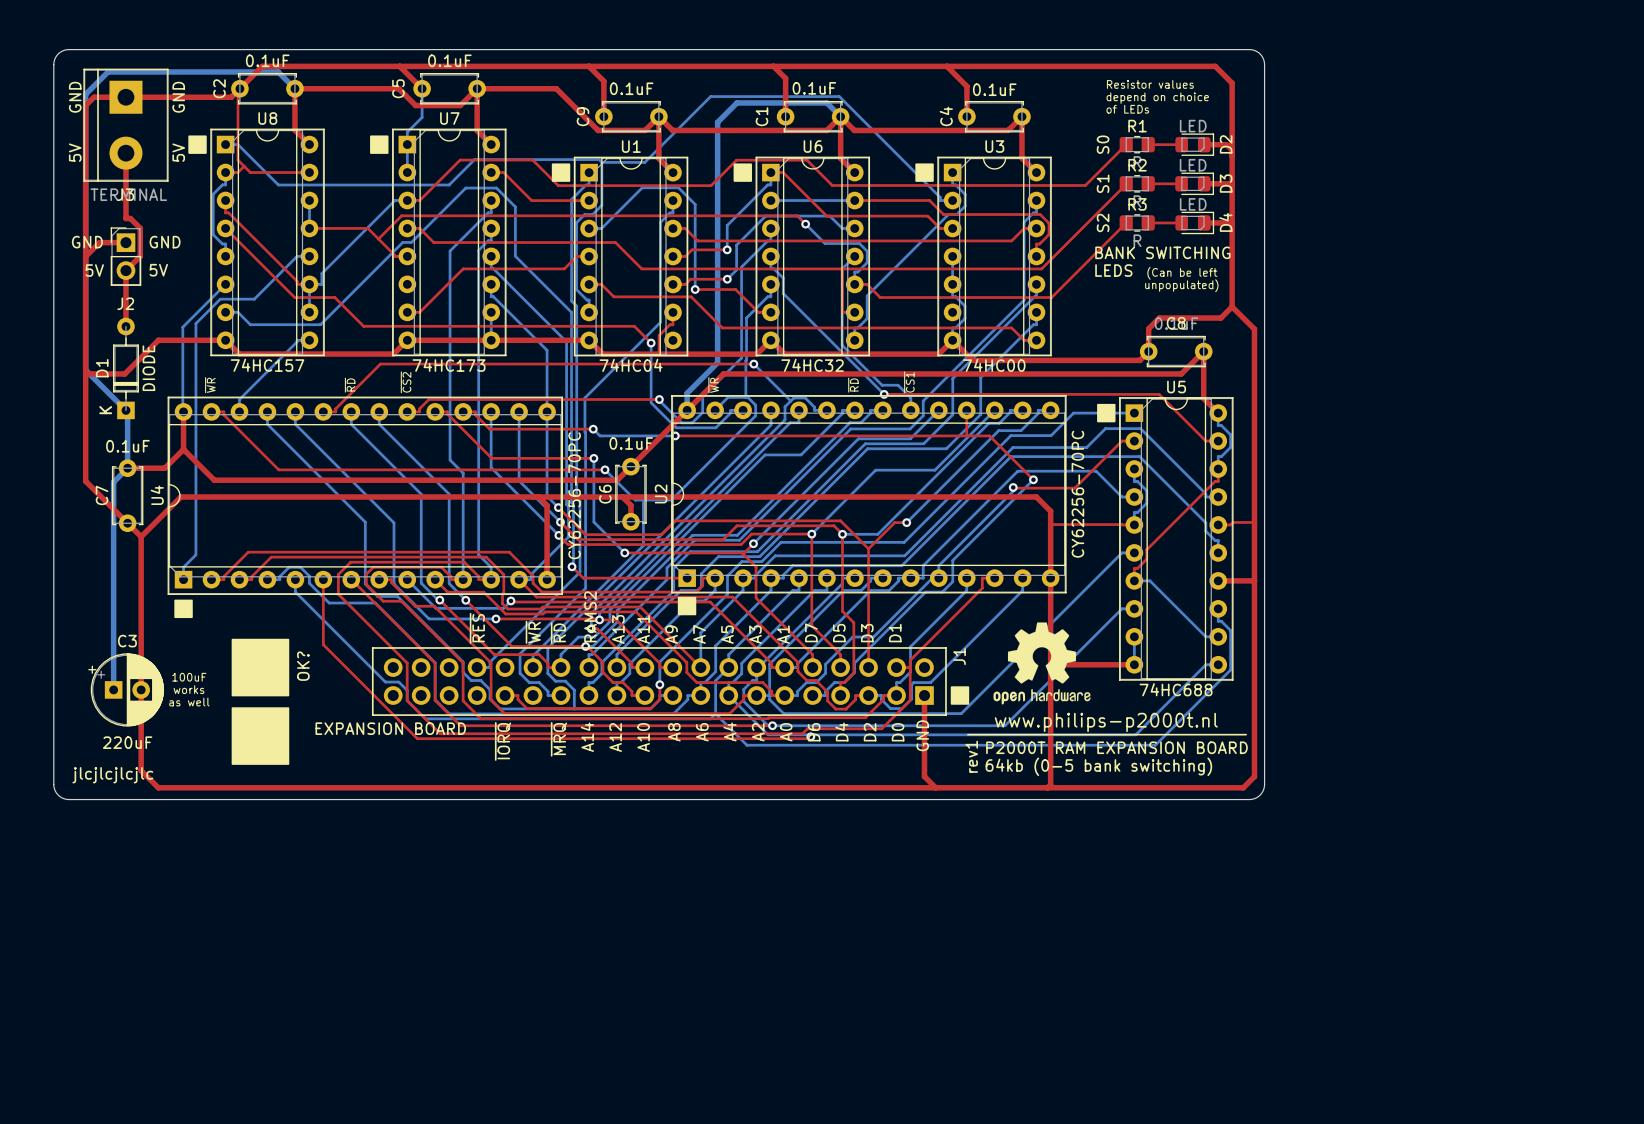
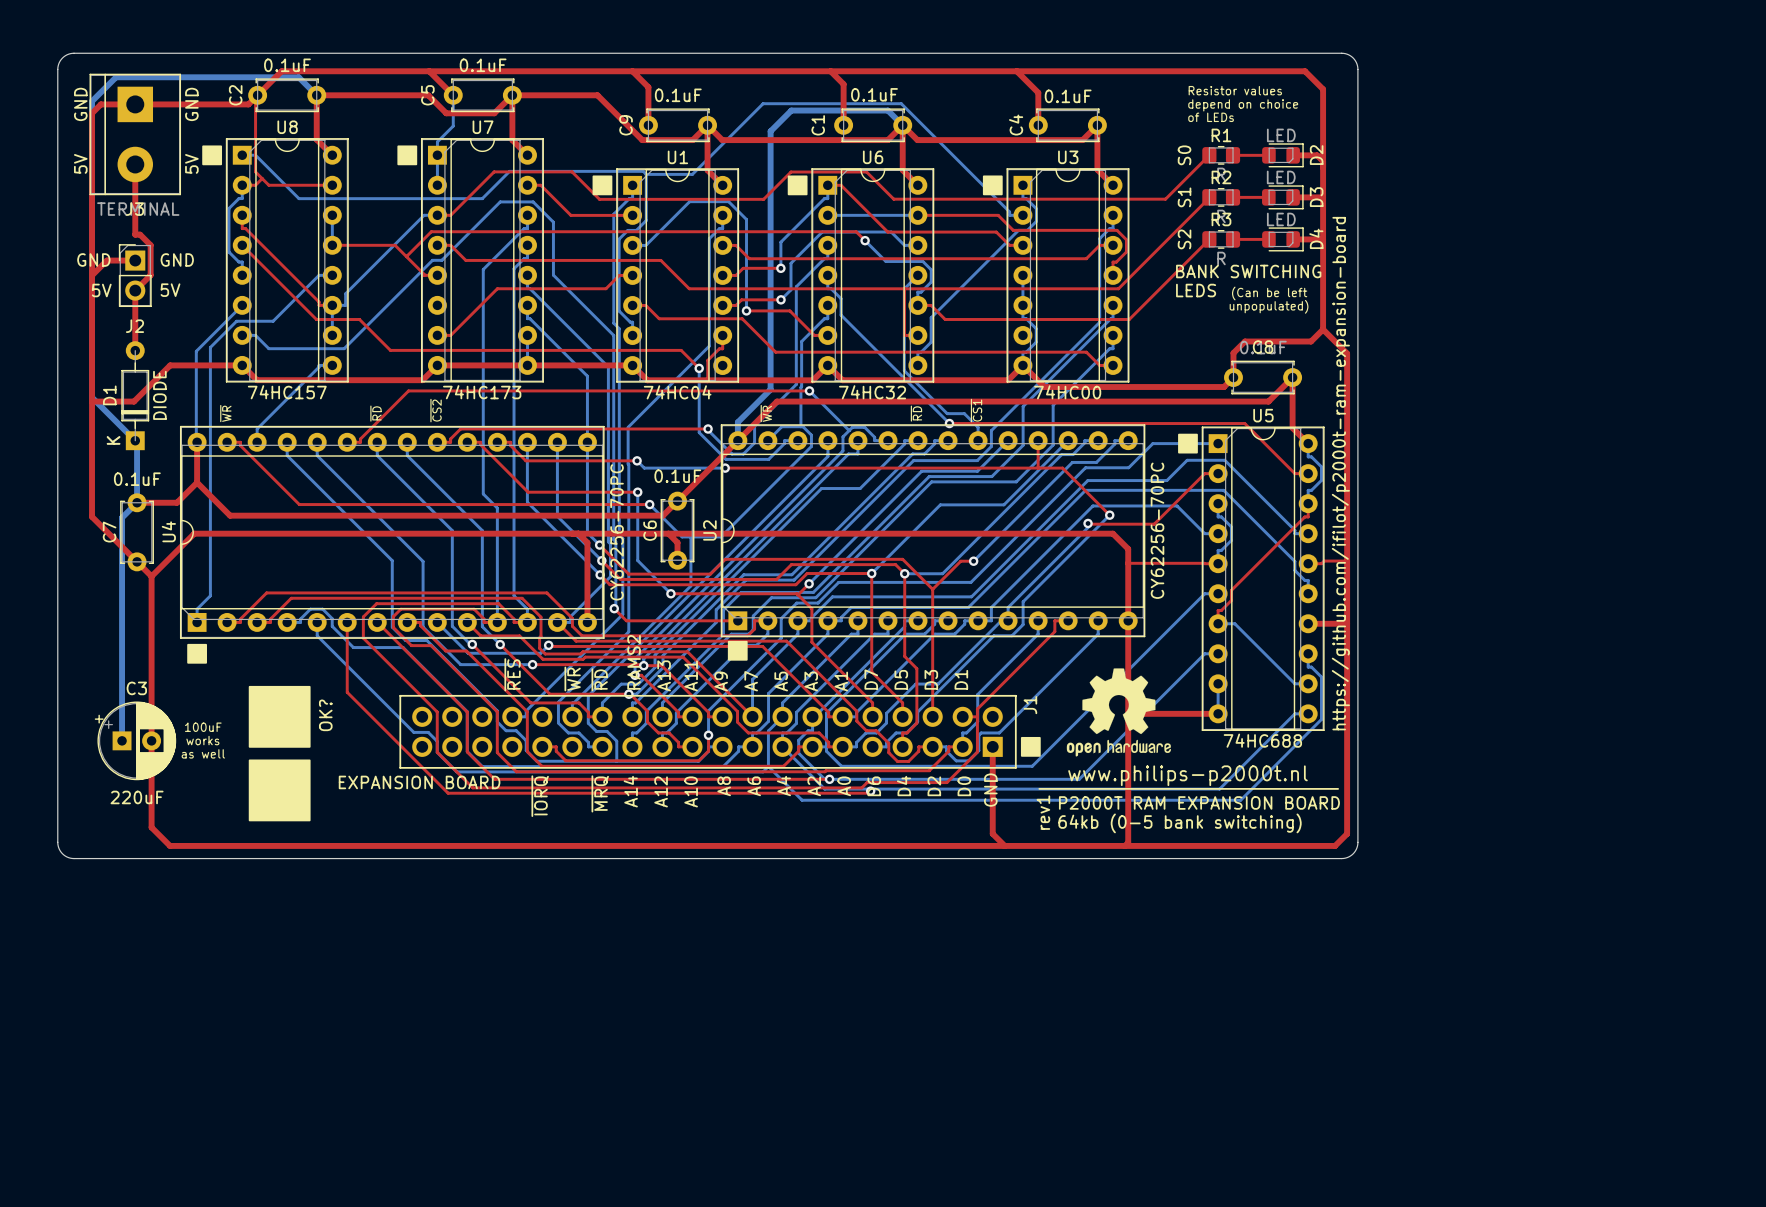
text: none -> https://github.com/ifilot/p2000t-ram-expansion-board (1340, 473)
text: jlcjlcjlcjlc (112, 775) -> none

